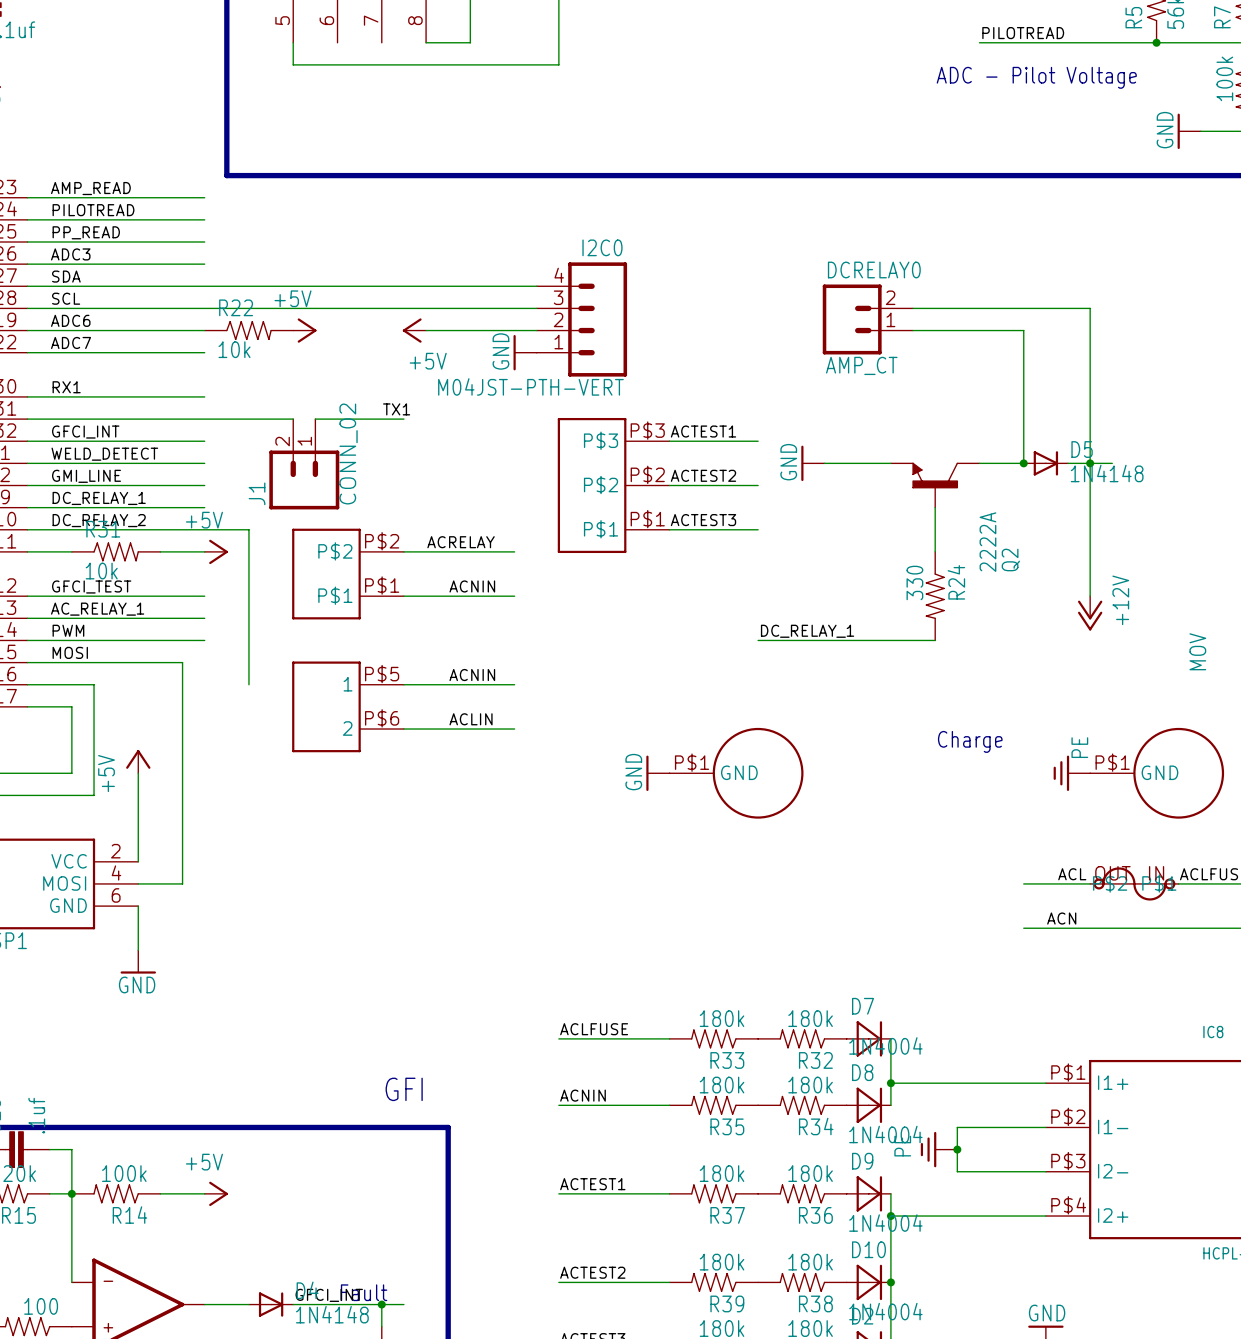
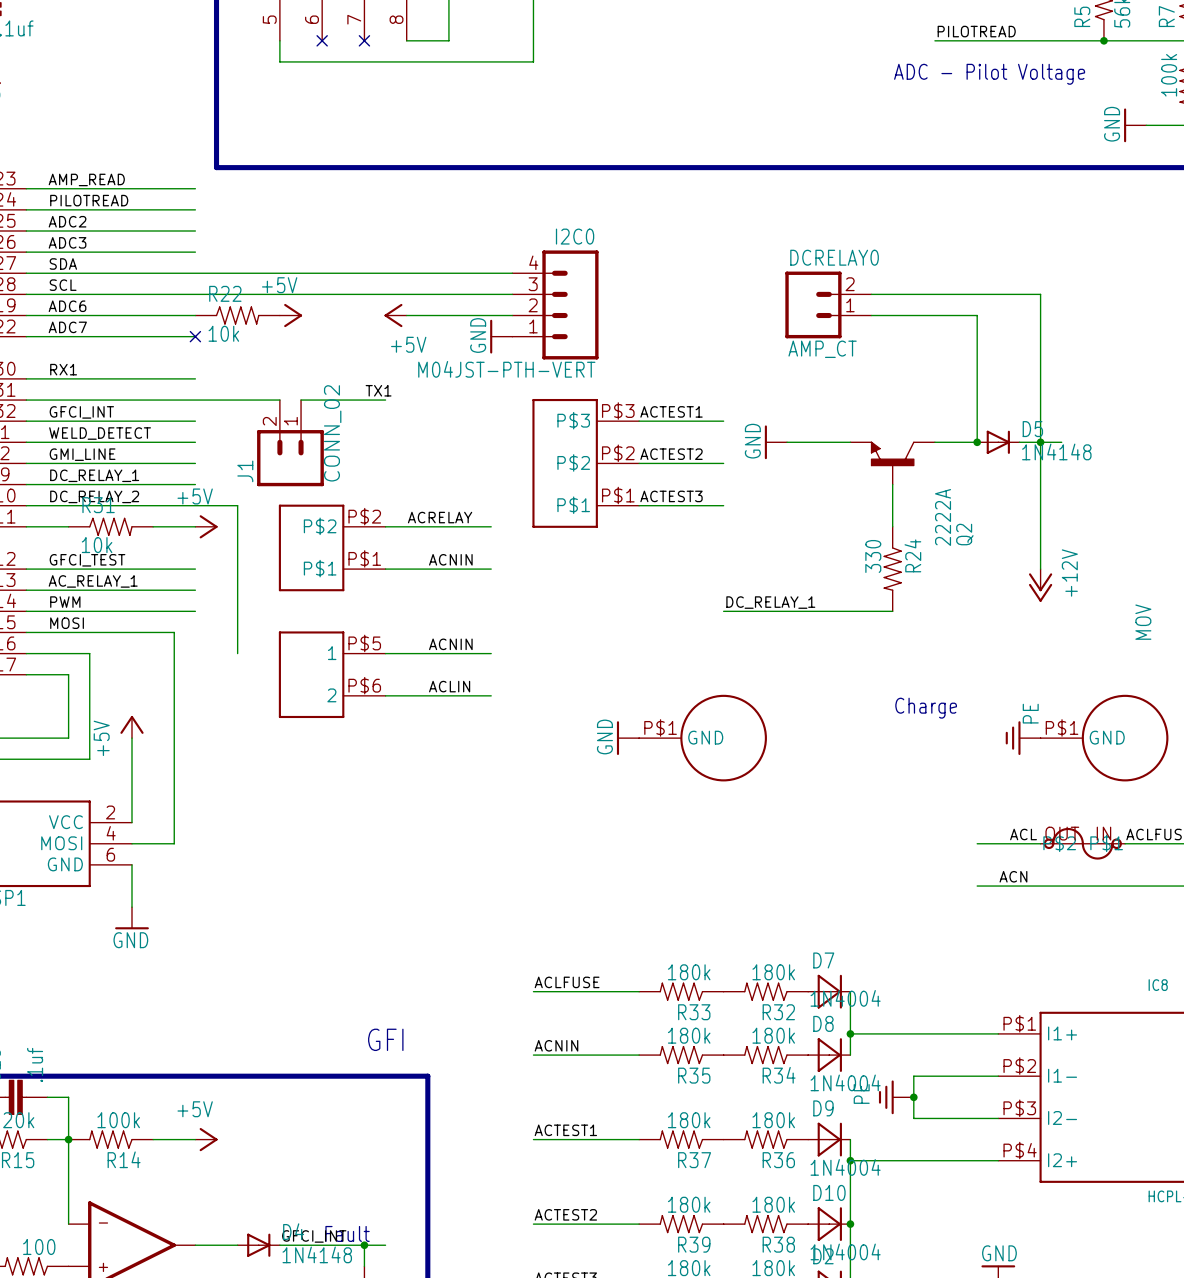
no-connect mark: none -> (322, 40)
no-connect mark: none -> (364, 40)
label: PP_READ (86, 232) -> ADC2 (67, 221)
no-connect mark: none -> (195, 336)

